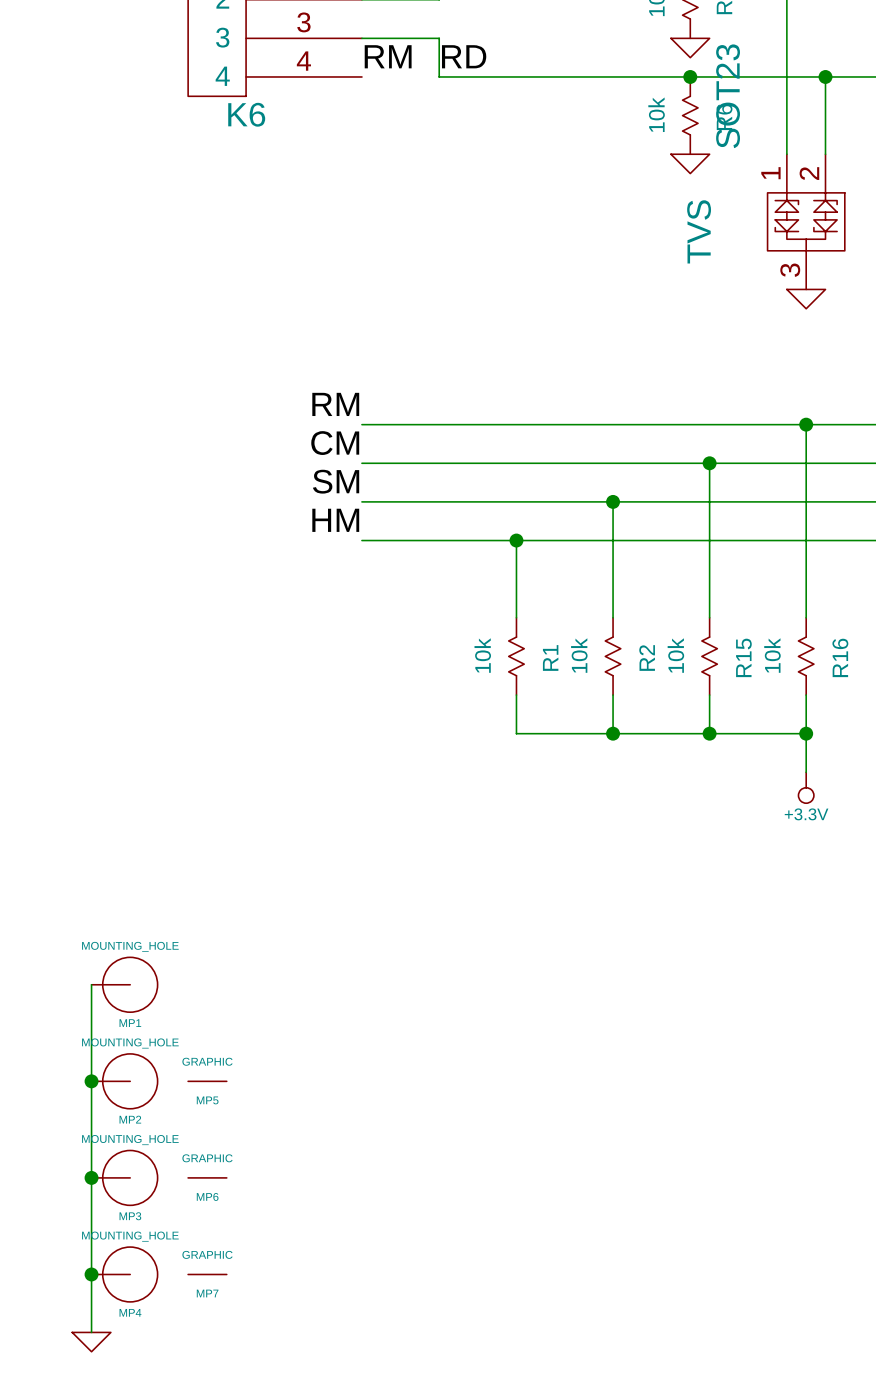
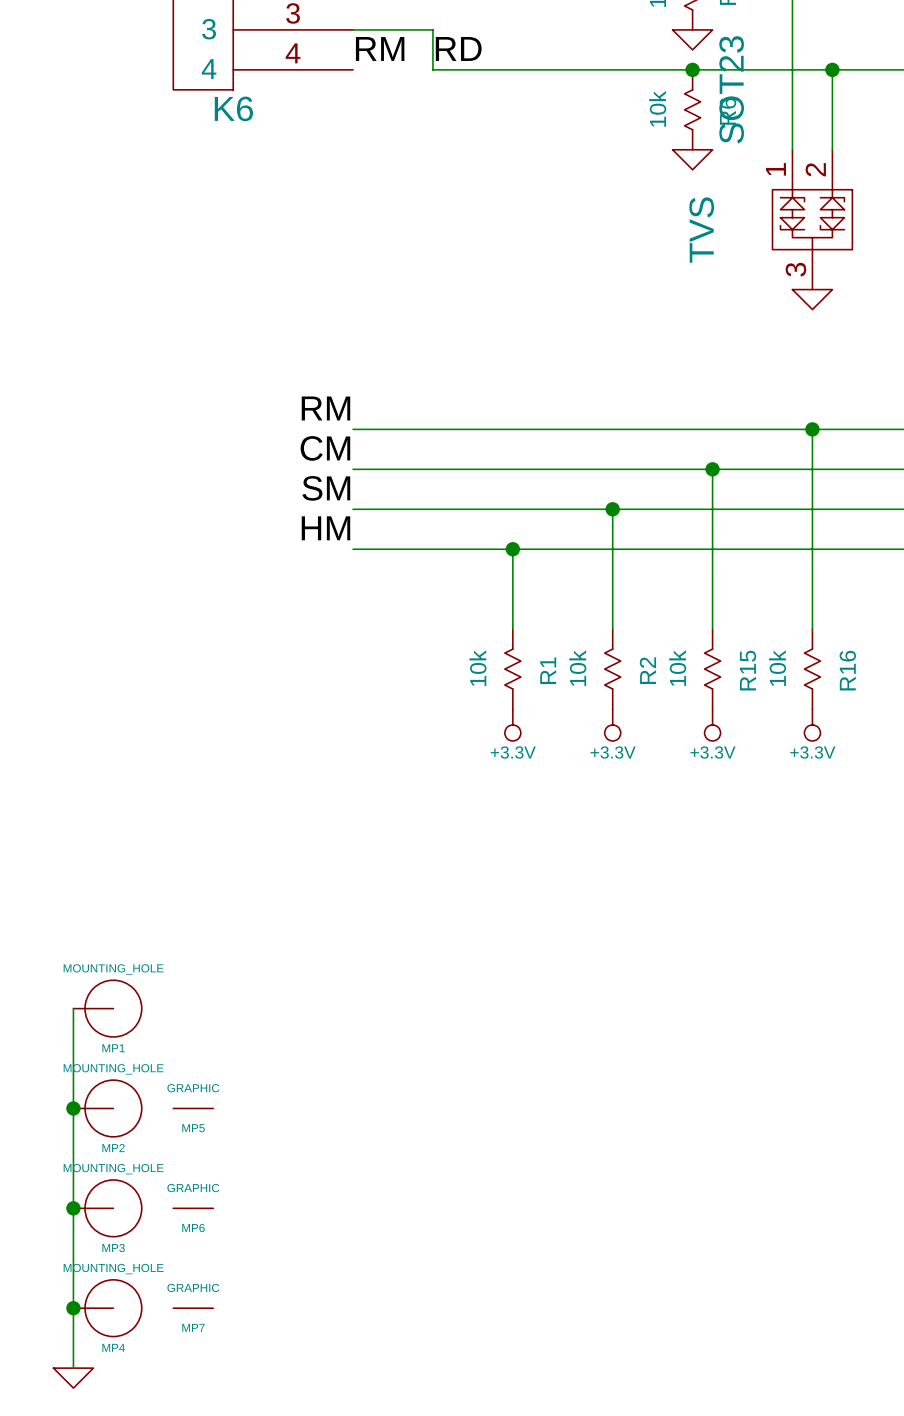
wire: (516, 695) (516, 733) (806, 733) -> none
wire: (613, 695) (613, 733) -> none
wire: (709, 695) (709, 733) -> none
wire: (806, 695) (806, 772) -> none
power symbol: none -> +3.3V (512, 724)
power symbol: none -> +3.3V (612, 724)
power symbol: none -> +3.3V (712, 724)
power symbol: none -> +3.3V (812, 724)
junction: (613, 733) -> none
junction: (709, 733) -> none
junction: (806, 733) -> none
power symbol: +3.3V (806, 787) -> none

